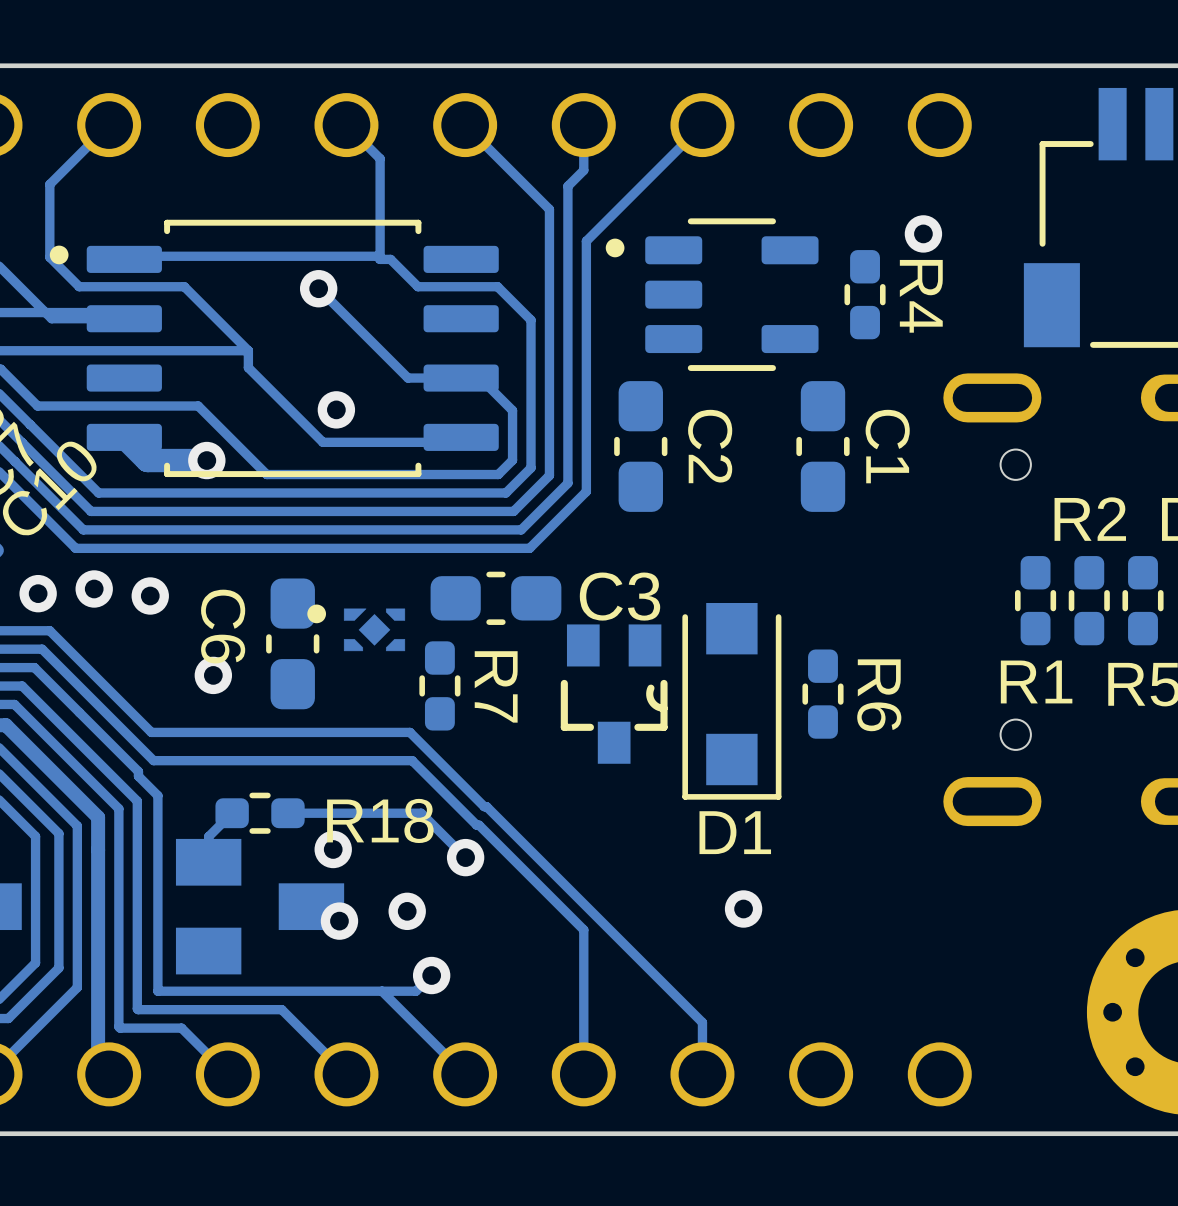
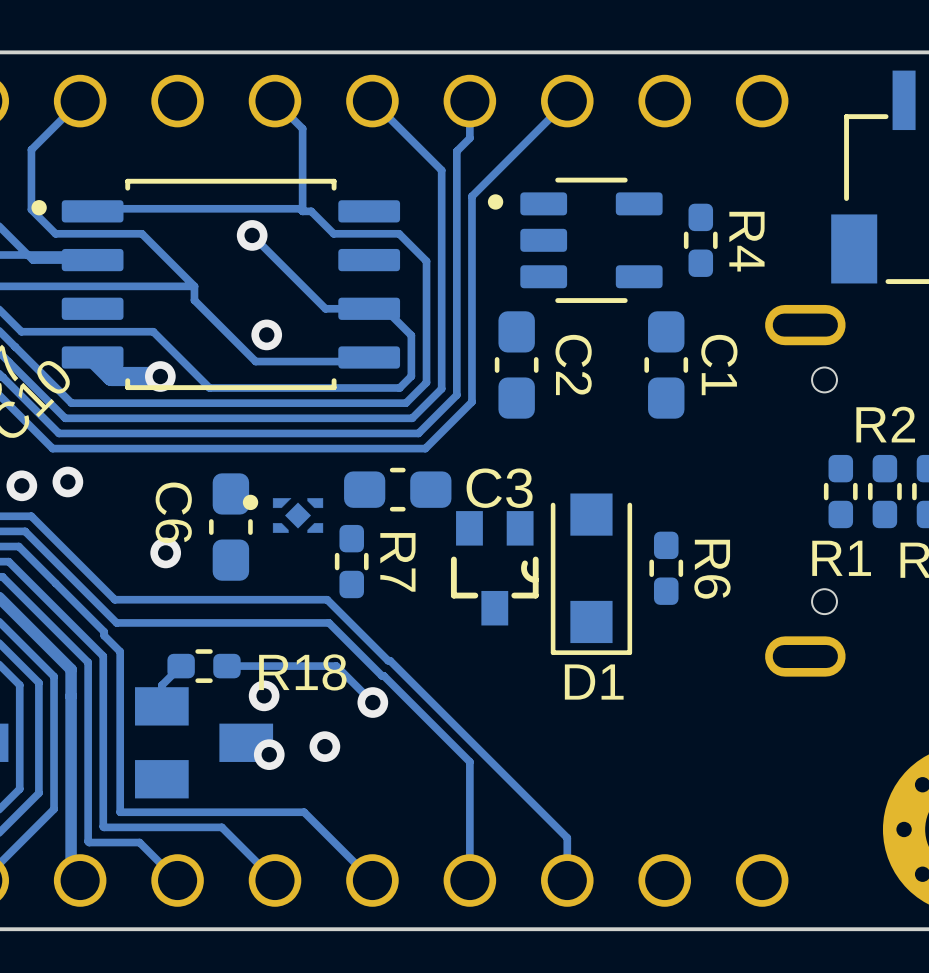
via: (923, 233) -> none
via: (150, 595) -> none
via: (743, 909) -> none
track: (431, 975) (415, 991) (381, 991) -> none
via: (431, 975) -> none

